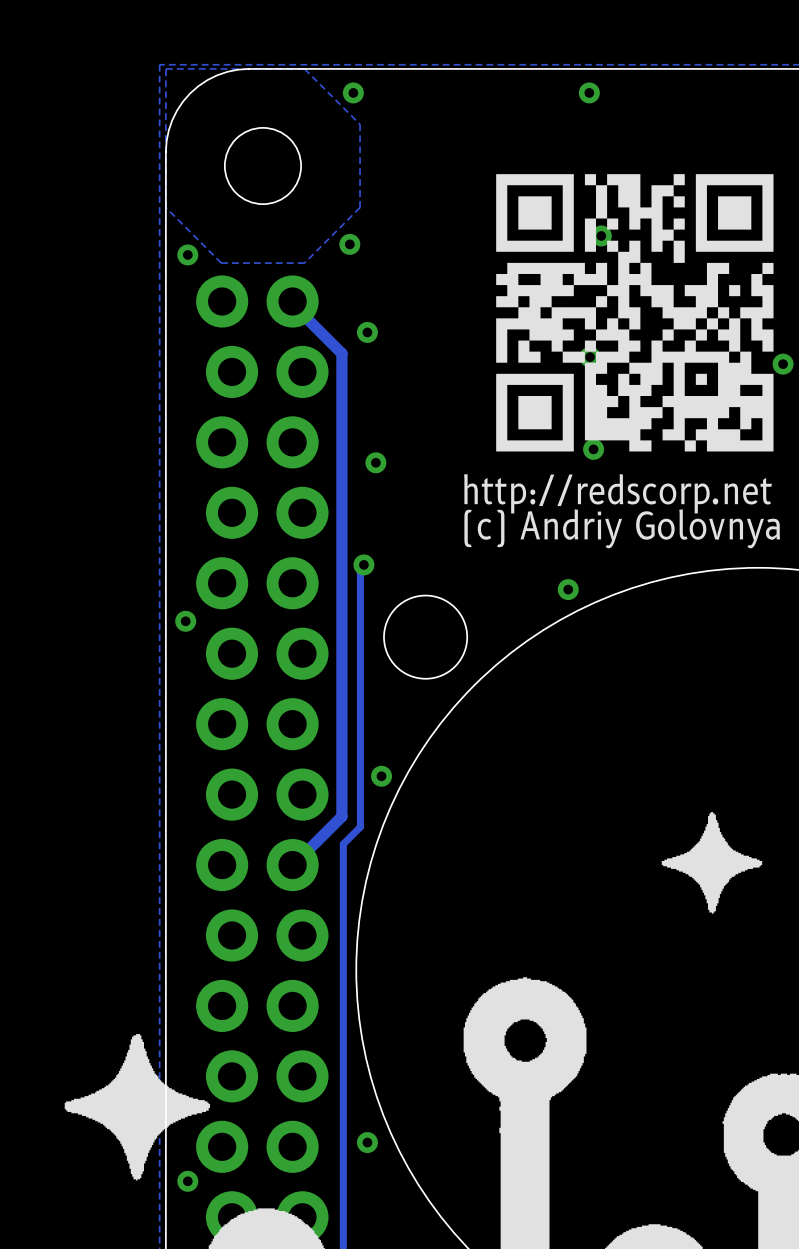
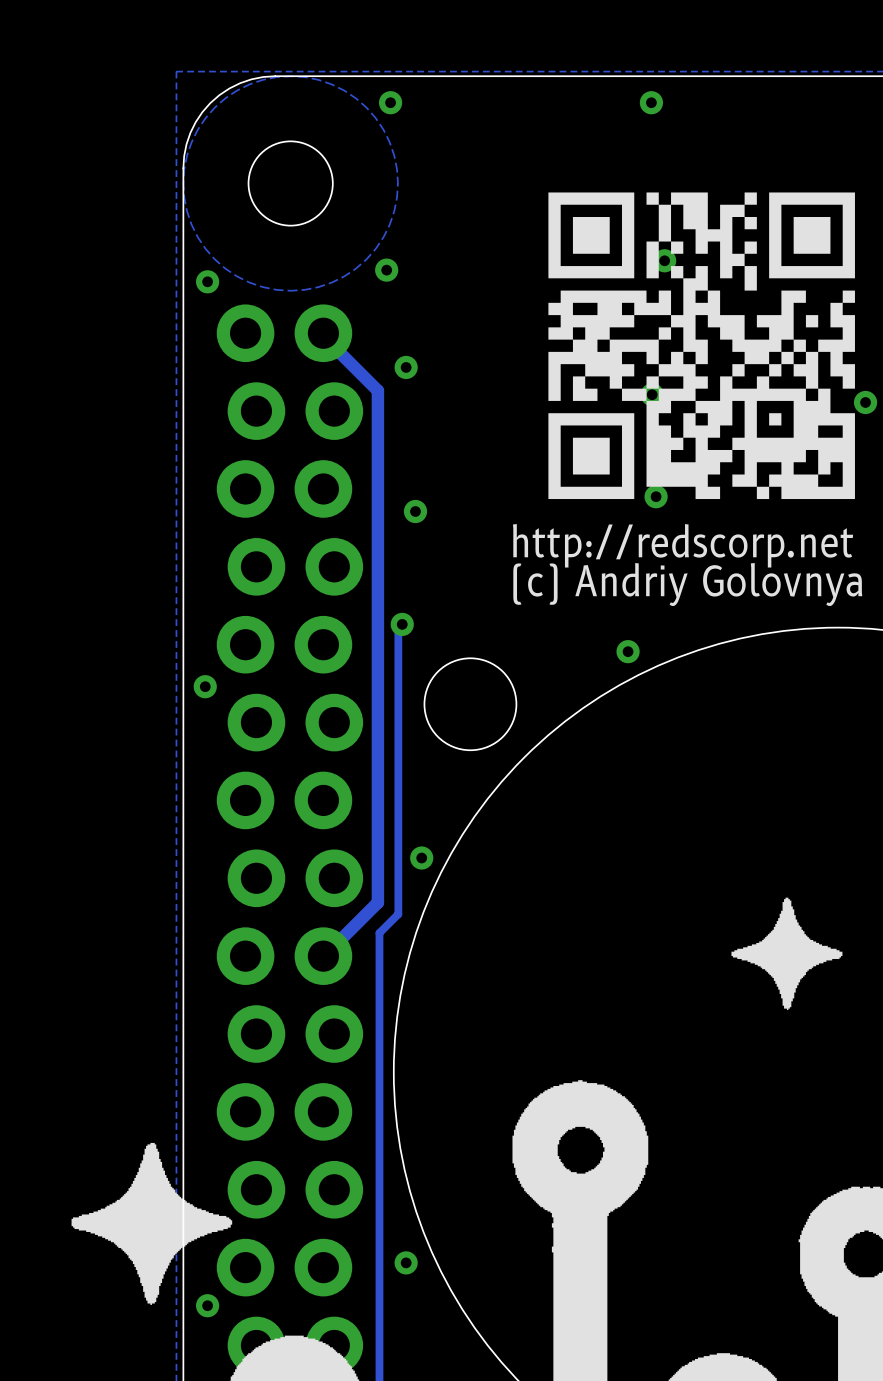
zone outline: (304, 68) (165, 68) (165, 207) (221, 263) (304, 263) (360, 207) (360, 124) (304, 68) -> (290, 76) (318, 79) (331, 84) (344, 90) (366, 107) (375, 118) (389, 142) (397, 169) (397, 183) (397, 197) (389, 224) (375, 248) (366, 259) (355, 268) (331, 282) (318, 287) (290, 290) (262, 287) (249, 282) (225, 268) (214, 259) (205, 248) (191, 224) (184, 197) (183, 183) (184, 169) (191, 142) (205, 118) (214, 107) (237, 90) (249, 84) (262, 79) (290, 76)

